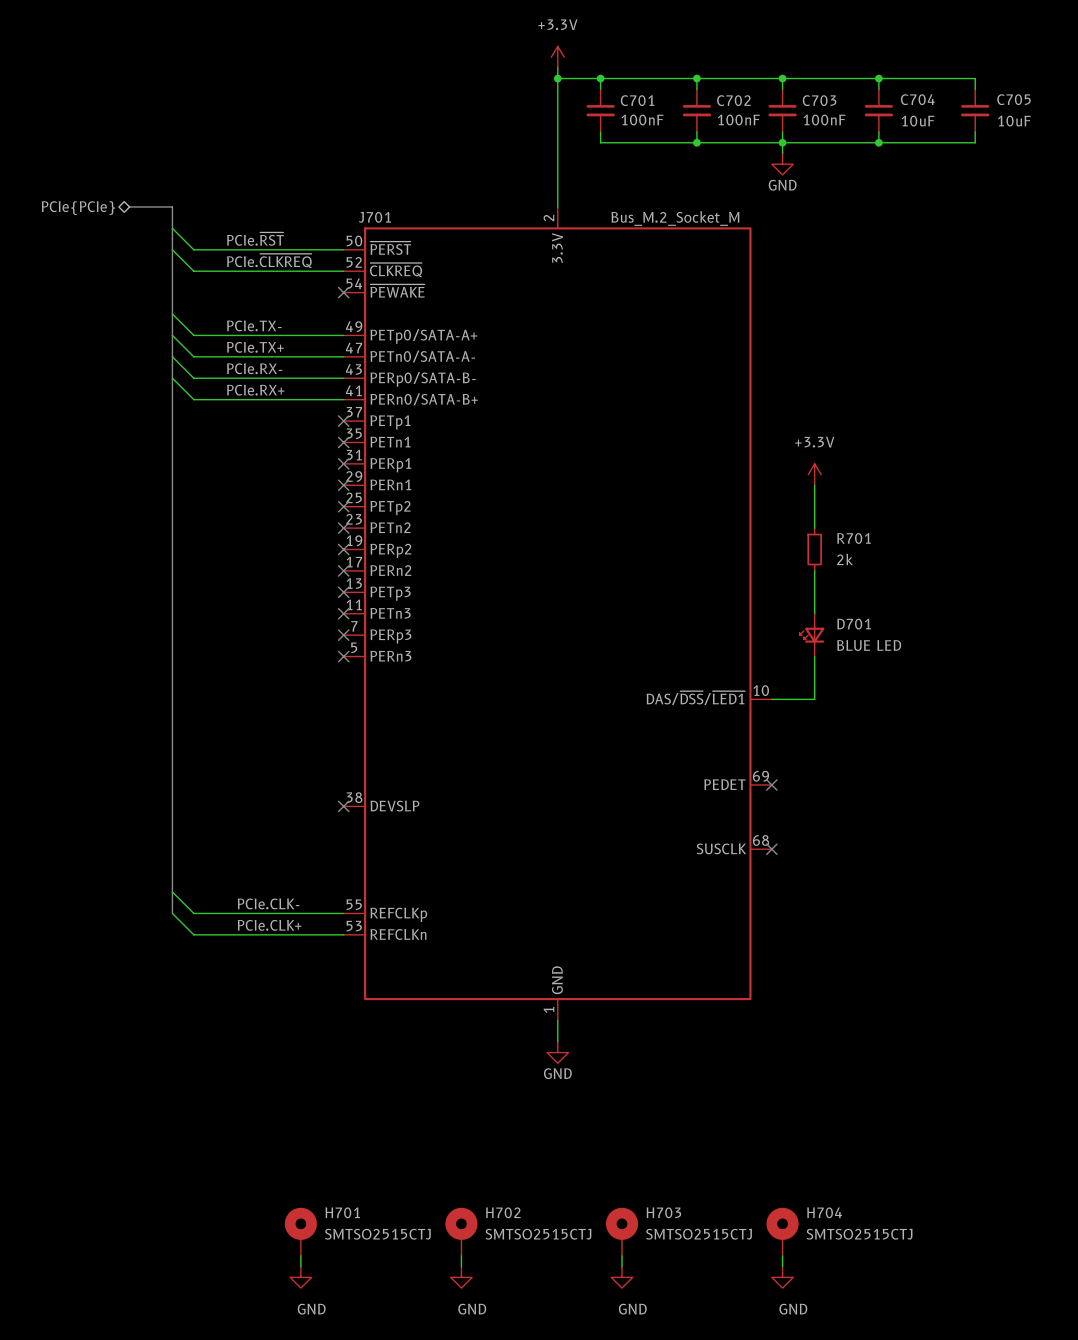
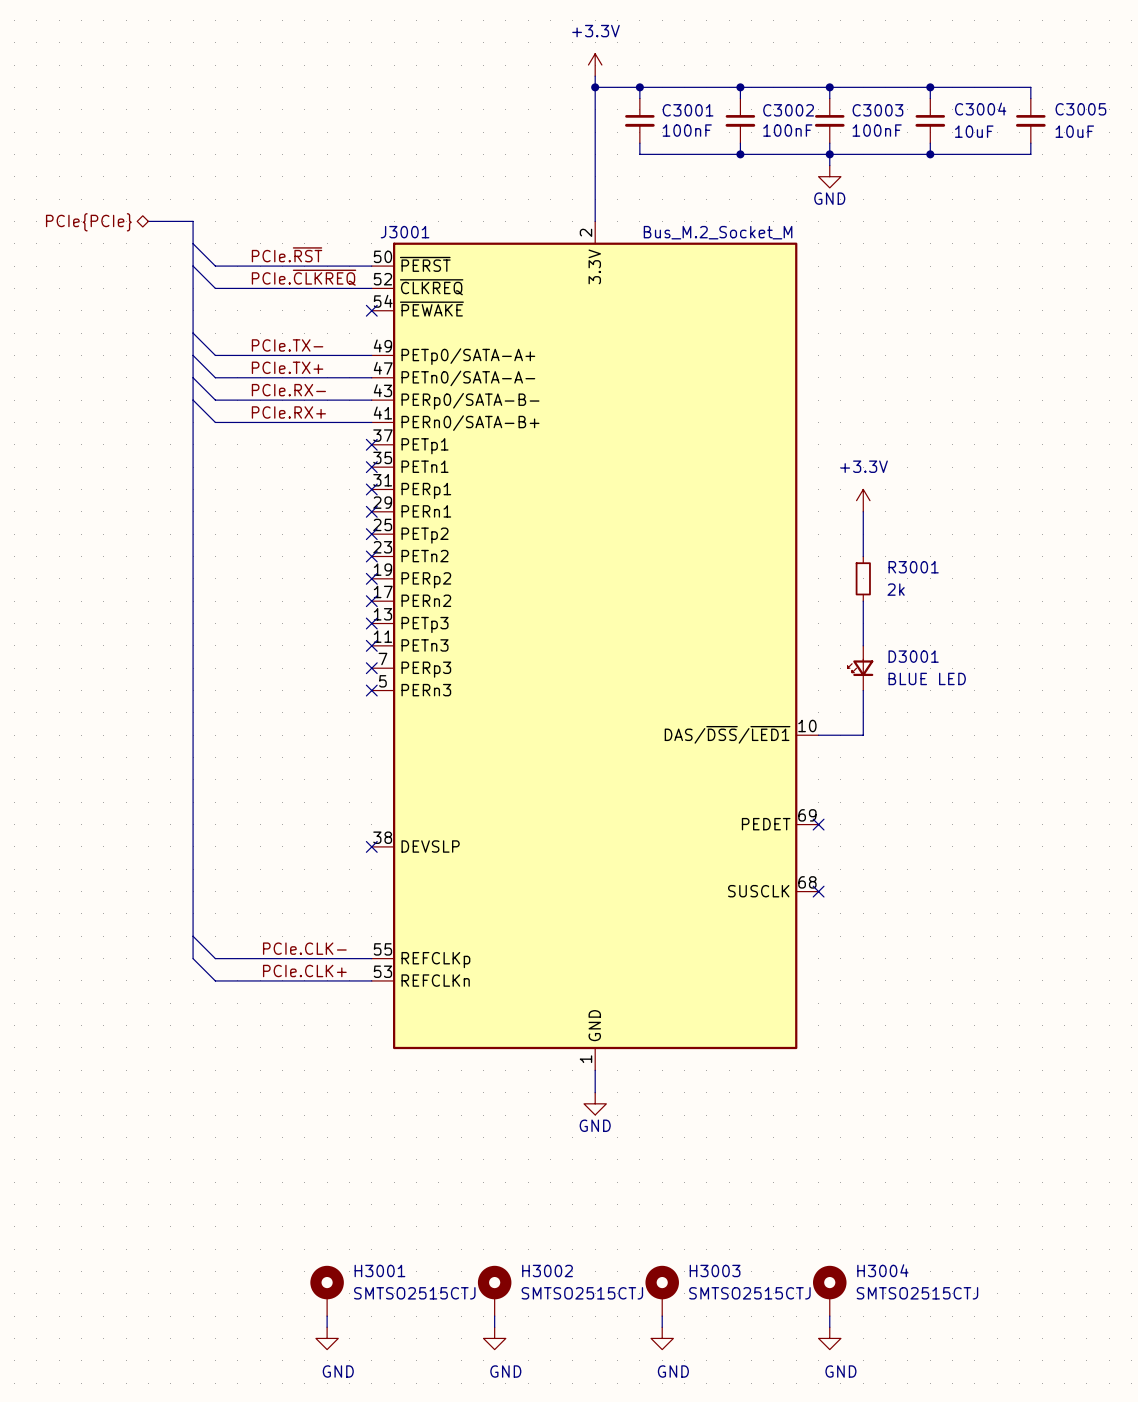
C704 name: C704 (917, 99) -> C3004 (980, 109)
C705 name: C705 (1014, 99) -> C3005 (1080, 109)
C701 name: C701 (637, 100) -> C3001 (688, 110)
C702 name: C702 (733, 100) -> C3002 (788, 110)
C703 name: C703 (819, 100) -> C3003 (877, 110)
J701 name: J701 (374, 217) -> J3001 (405, 232)
R701 name: R701 (854, 538) -> R3001 (913, 567)
D701 name: D701 (854, 624) -> D3001 (913, 656)
H701 name: H701 (342, 1212) -> H3001 (379, 1270)
H702 name: H702 (503, 1212) -> H3002 (547, 1270)
H703 name: H703 (663, 1212) -> H3003 (715, 1270)
H704 name: H704 (824, 1212) -> H3004 (882, 1270)

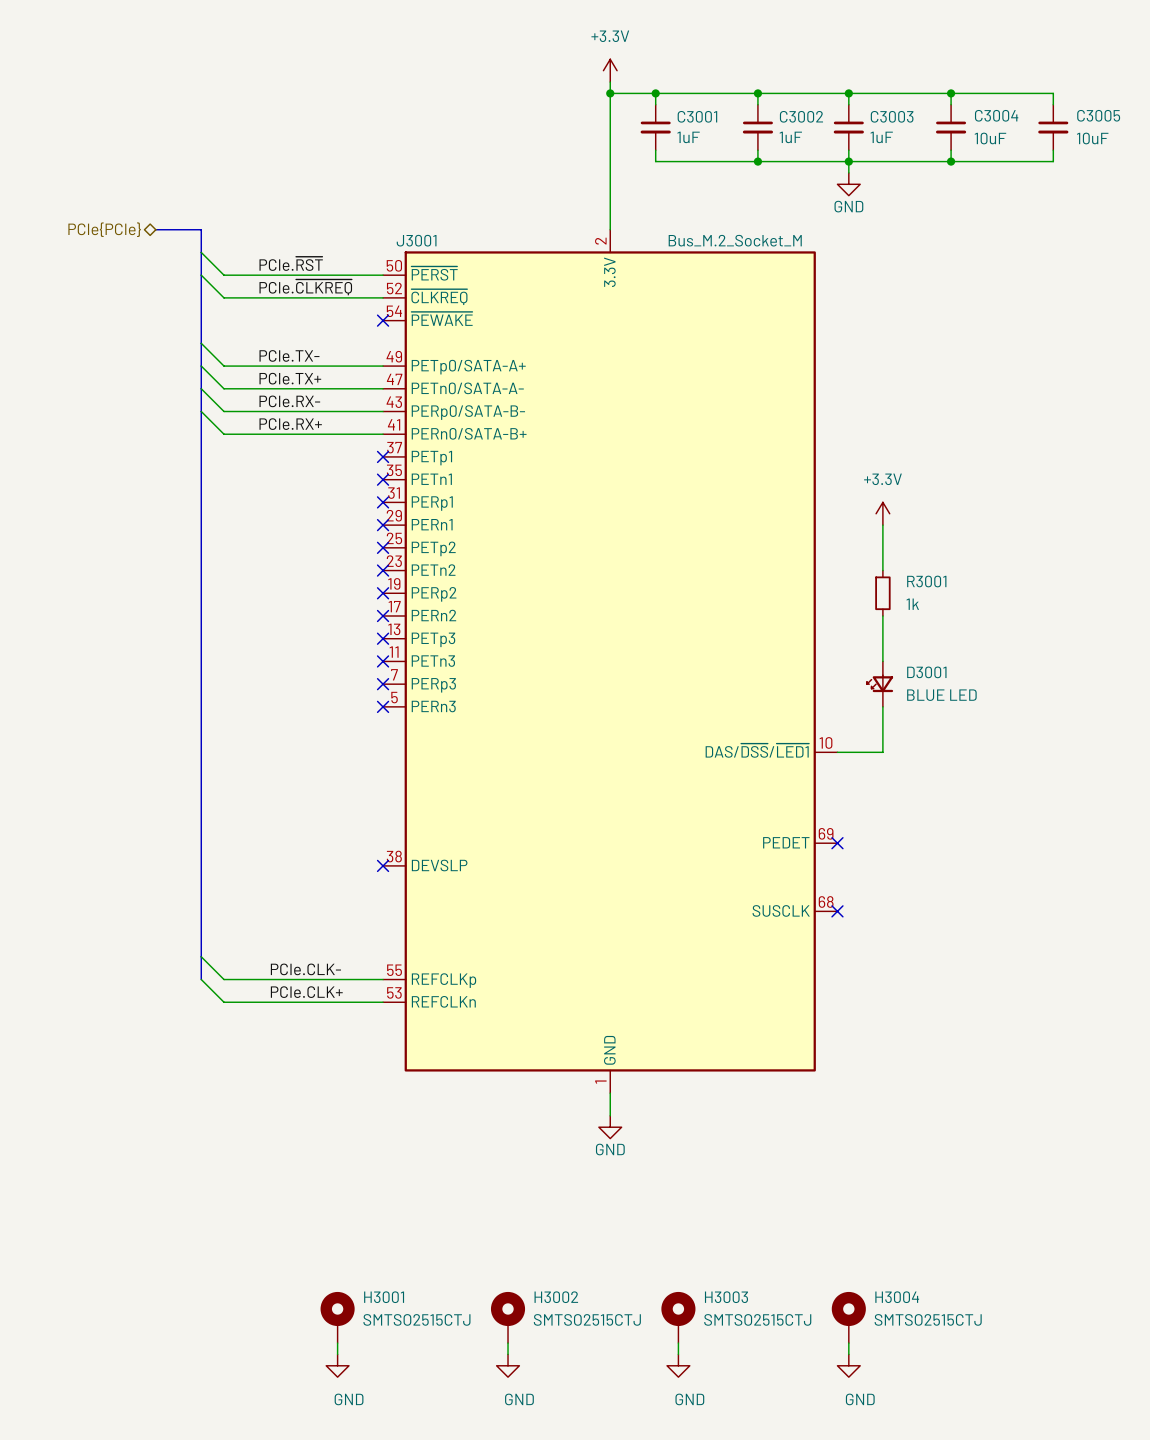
C3001 value: 100nF (687, 130) -> 1uF (688, 137)
C3002 value: 100nF (787, 130) -> 1uF (790, 137)
C3003 value: 100nF (877, 130) -> 1uF (881, 137)
R3001 value: 2k (896, 589) -> 1k (912, 604)

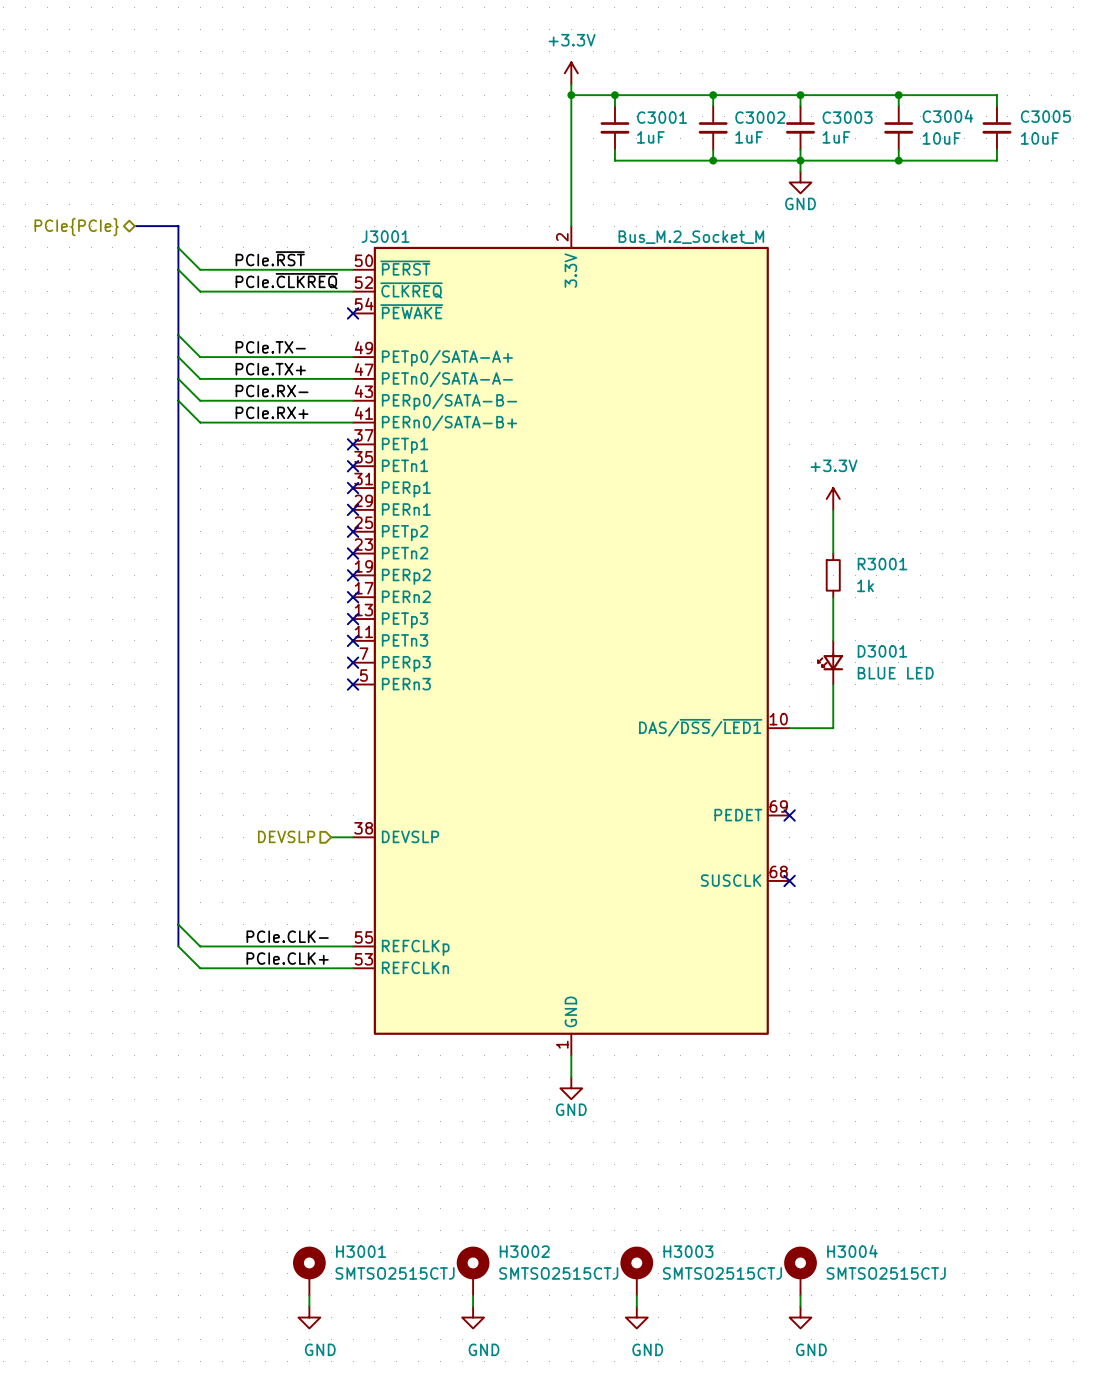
hierarchical label: none -> DEVSLP (286, 836)
wire: none -> (331, 837) (353, 837)
no-connect mark: (383, 865) -> none

